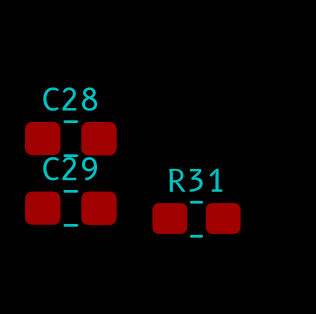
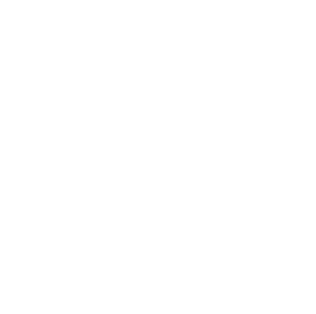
C28: (70, 138) -> none
C29: (70, 208) -> none
R31: (196, 219) -> none

